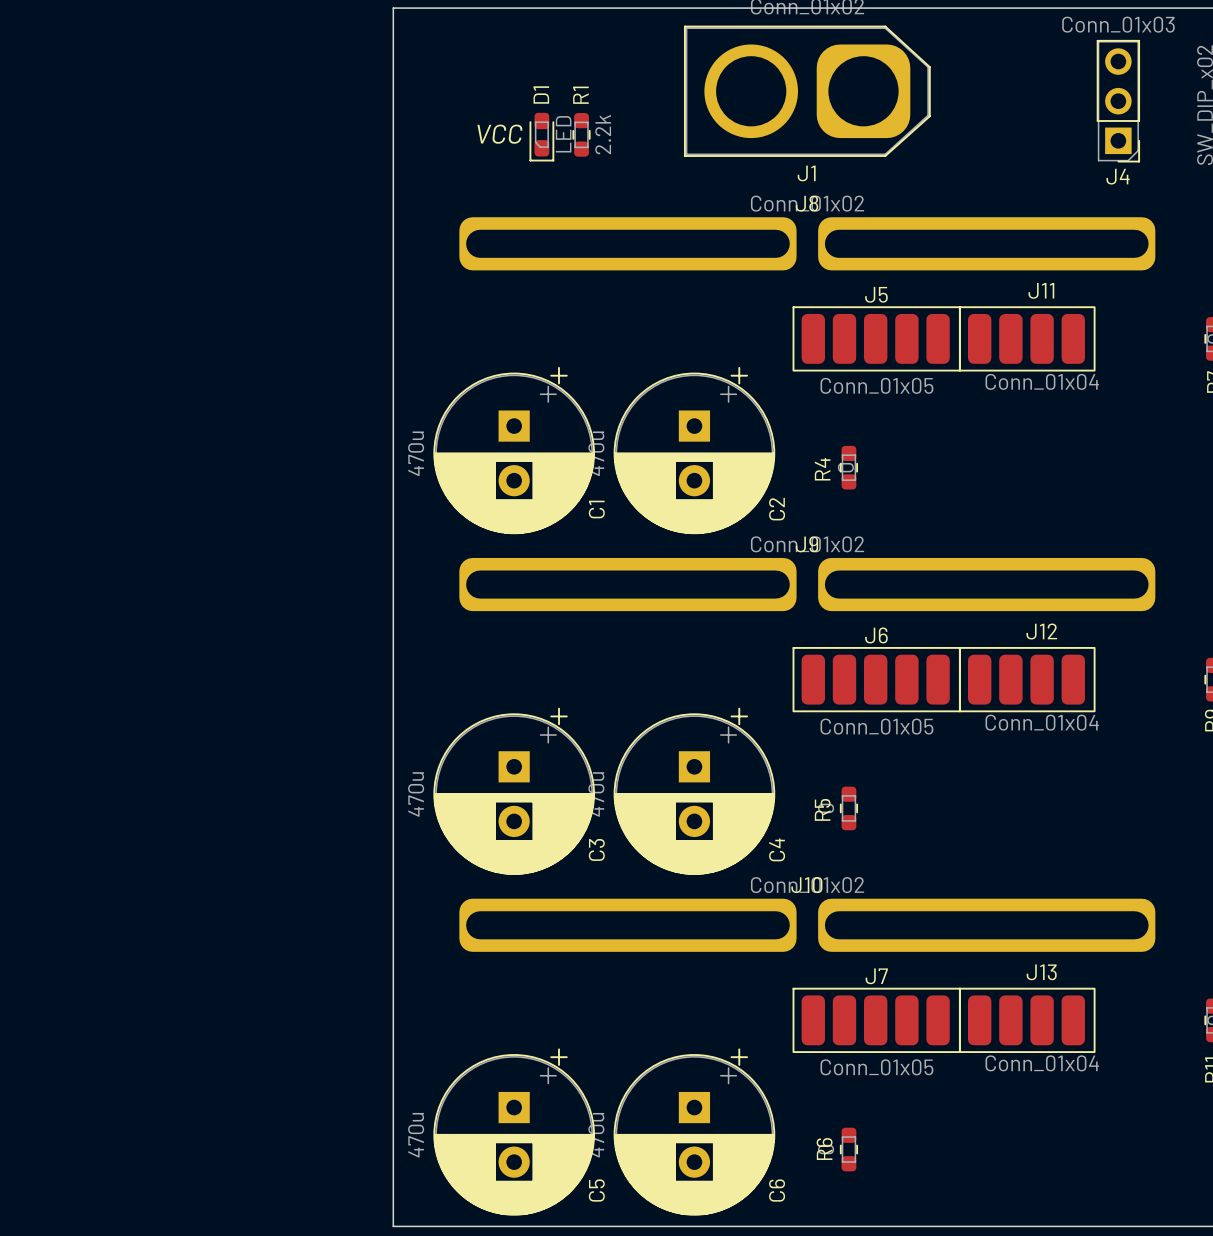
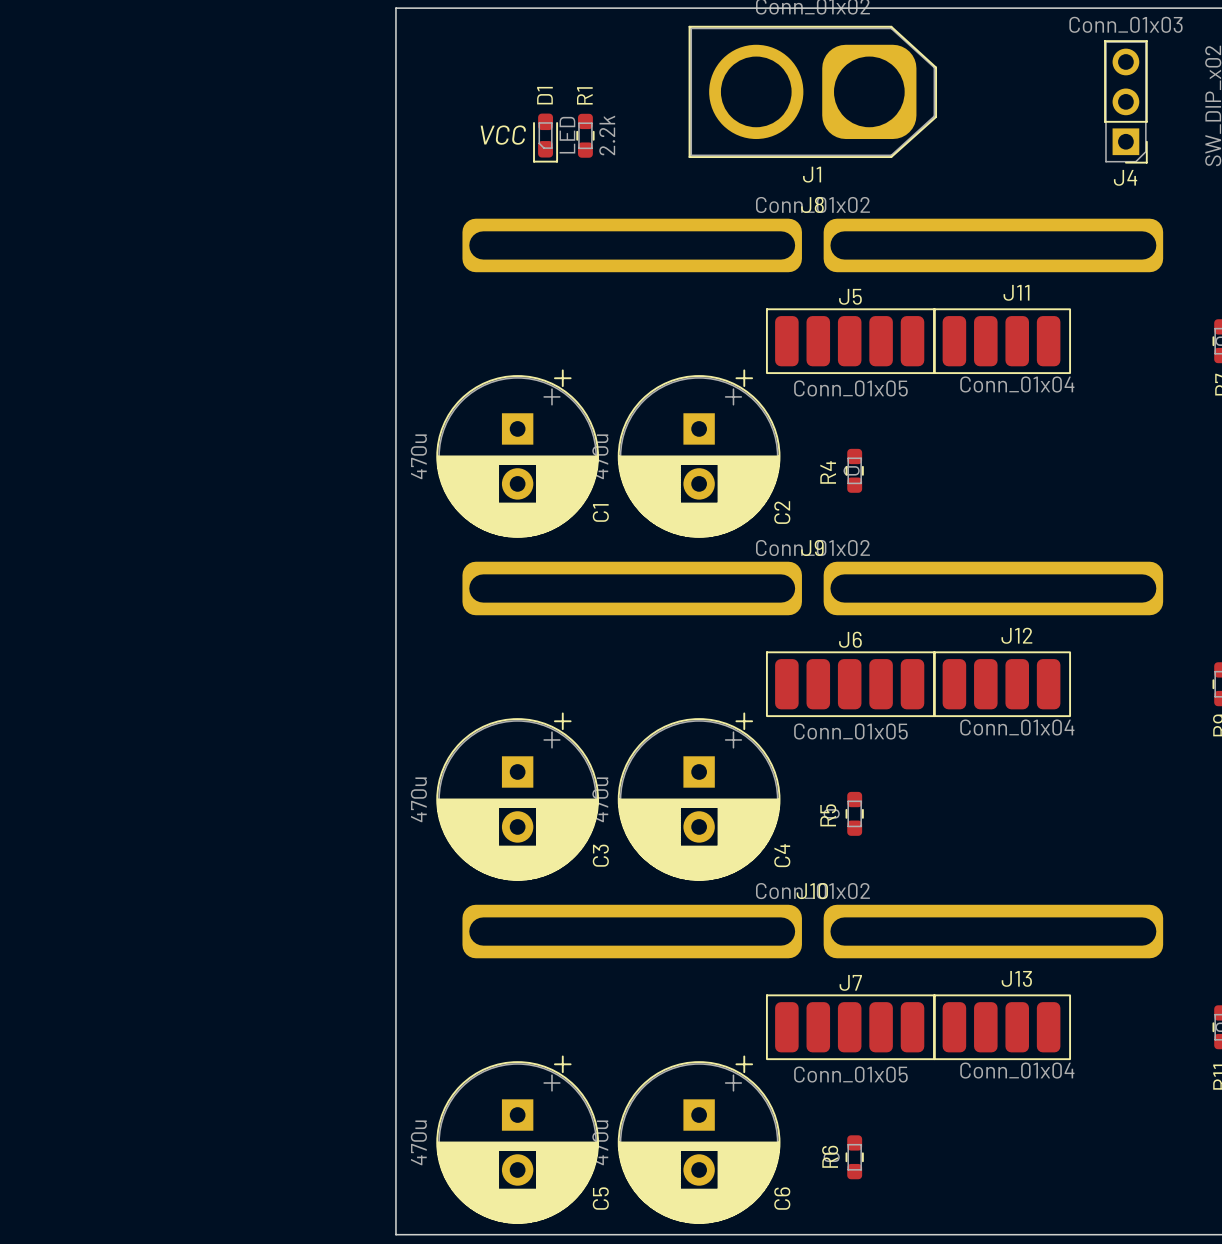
J5 position: (876, 338) -> (850, 341)
J11 position: (1027, 338) -> (1002, 341)
J6 position: (876, 679) -> (850, 684)
J12 position: (1027, 679) -> (1002, 684)
J7 position: (876, 1020) -> (850, 1027)
J13 position: (1027, 1020) -> (1002, 1027)

